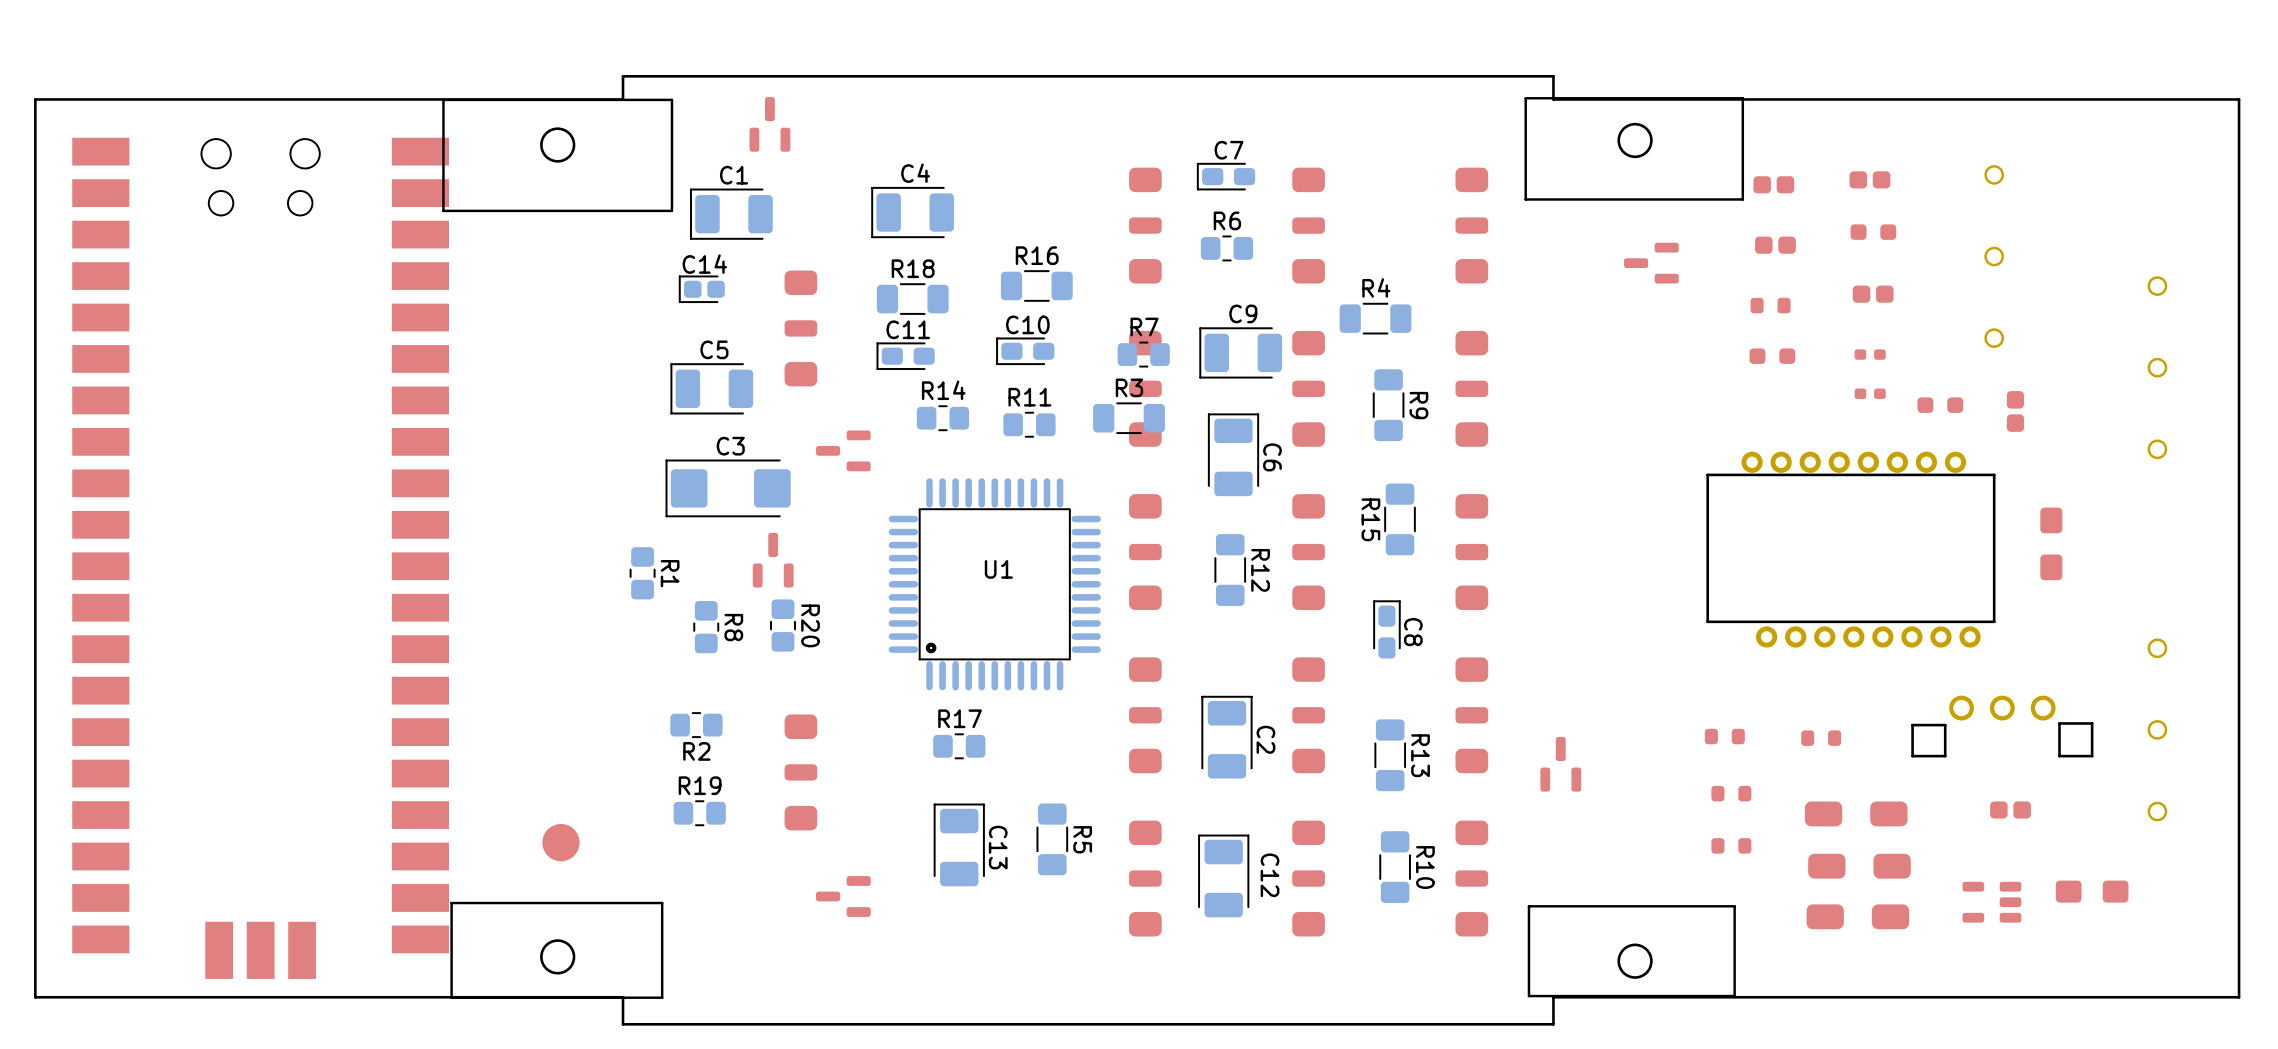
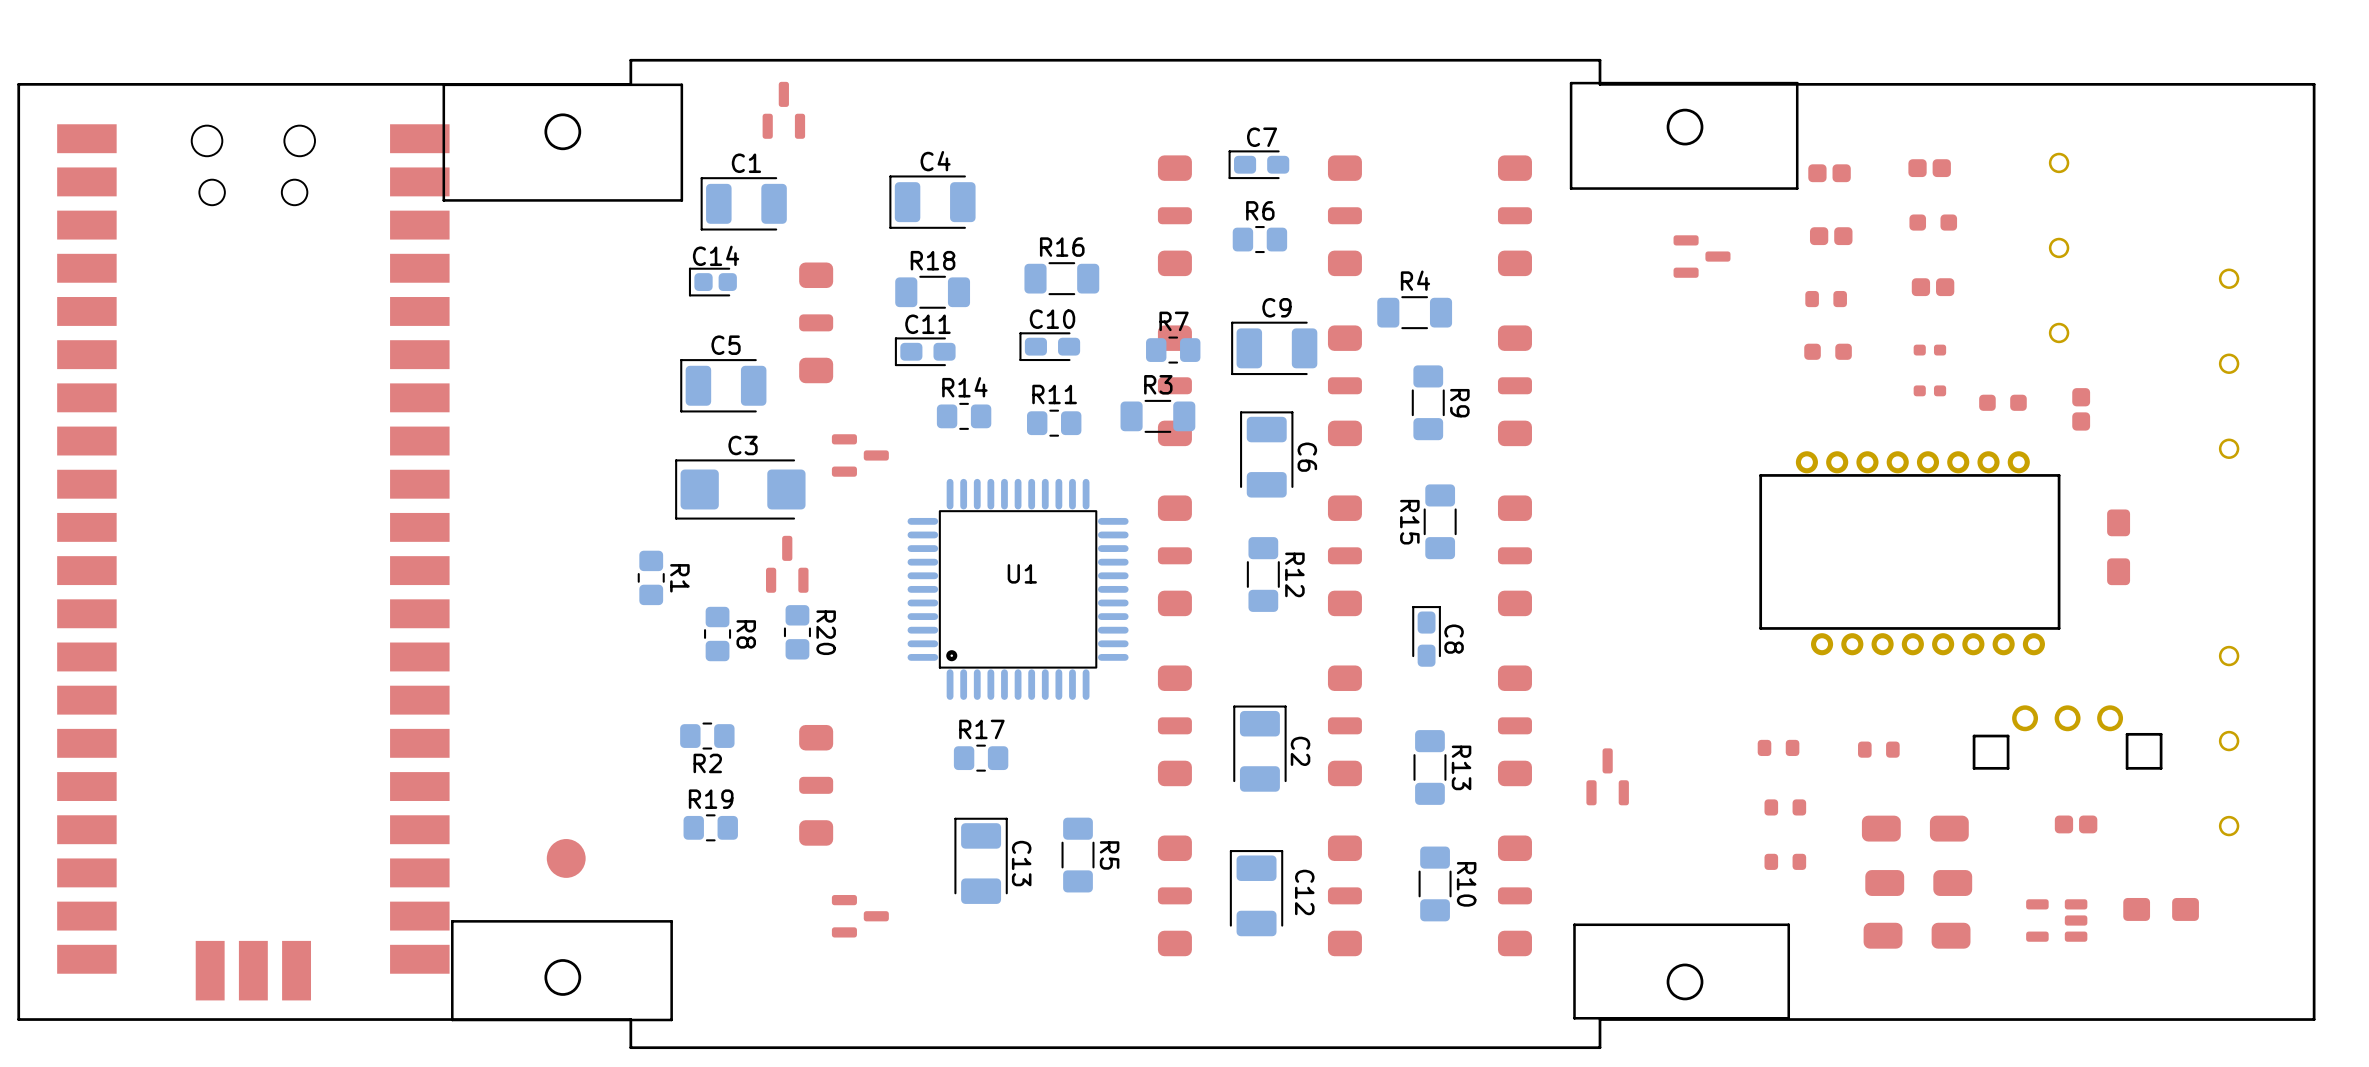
part rotation: 0° (1651, 263) -> 180° (1702, 256)
part rotation: 0° (843, 450) -> 180° (860, 455)
part rotation: 0° (843, 896) -> 180° (860, 916)

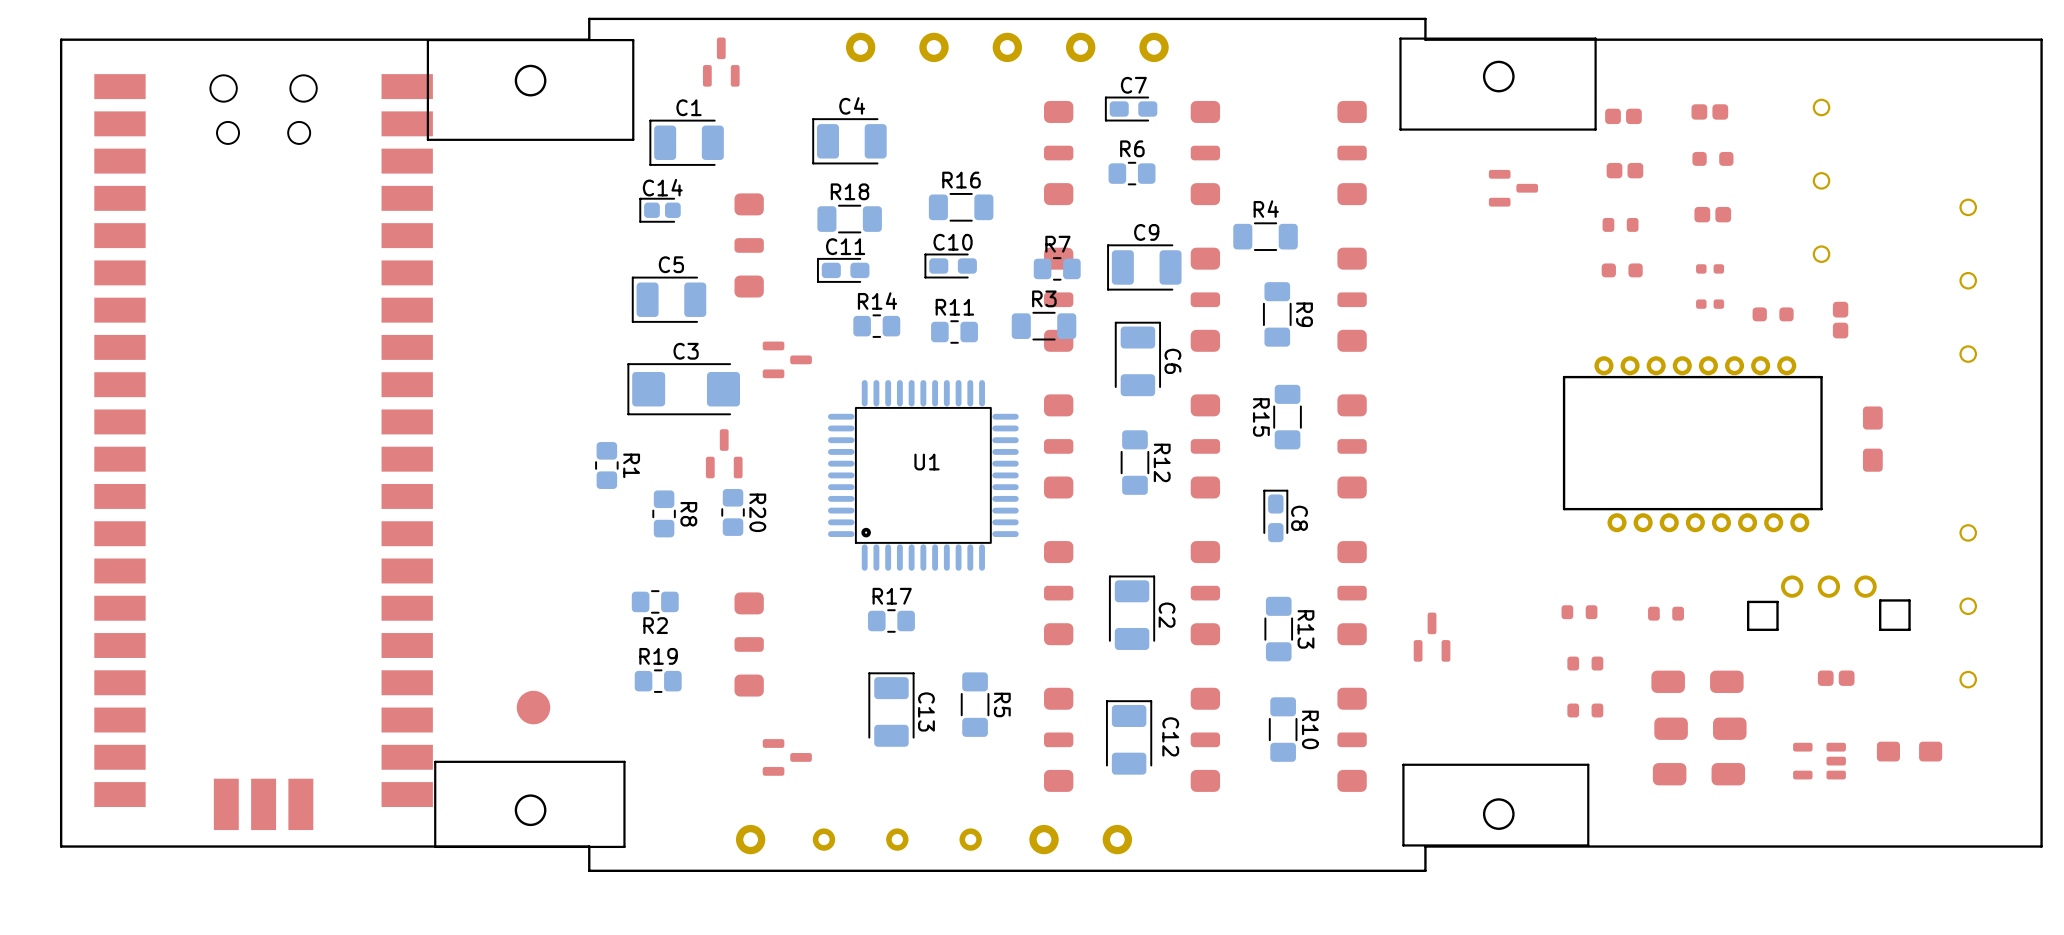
part: none -> (860, 47)
part: none -> (933, 47)
part: none -> (1007, 47)
part: none -> (1080, 47)
part: none -> (1154, 47)
part: none -> (750, 839)
part: none -> (823, 839)
part: none -> (897, 839)
part: none -> (970, 839)
part: none -> (1044, 839)
part: none -> (1117, 839)

